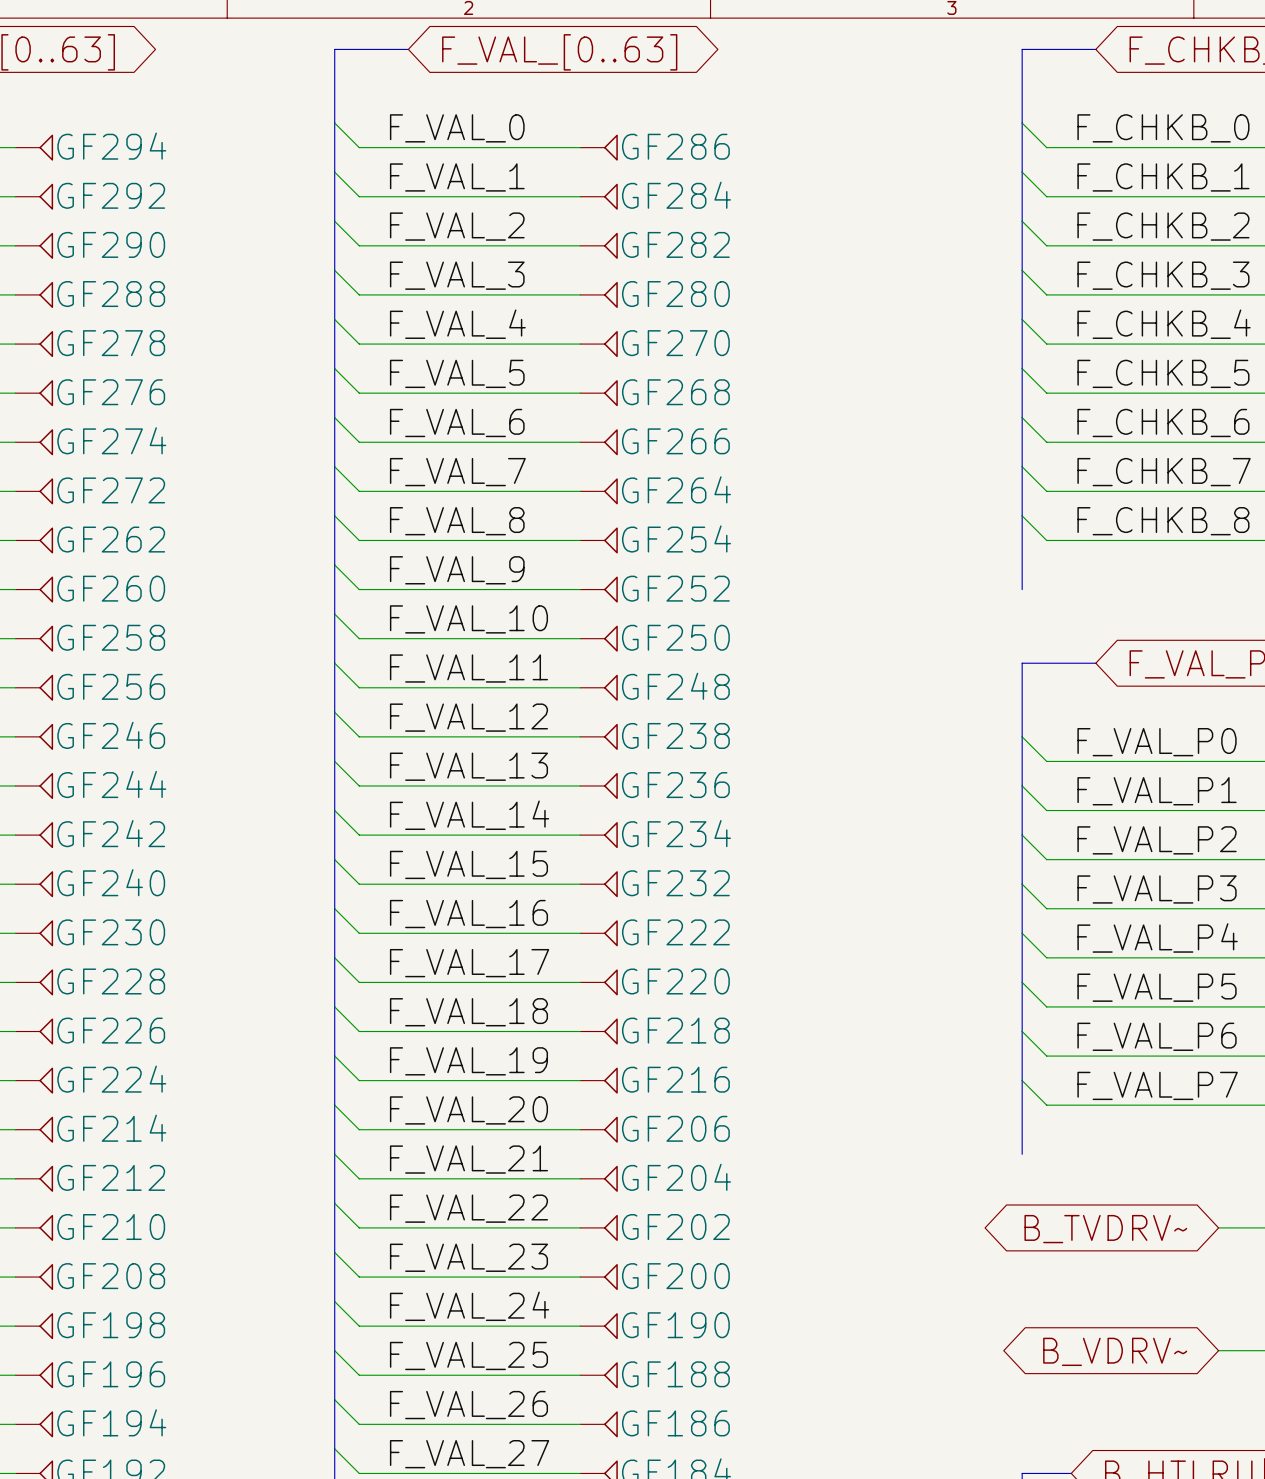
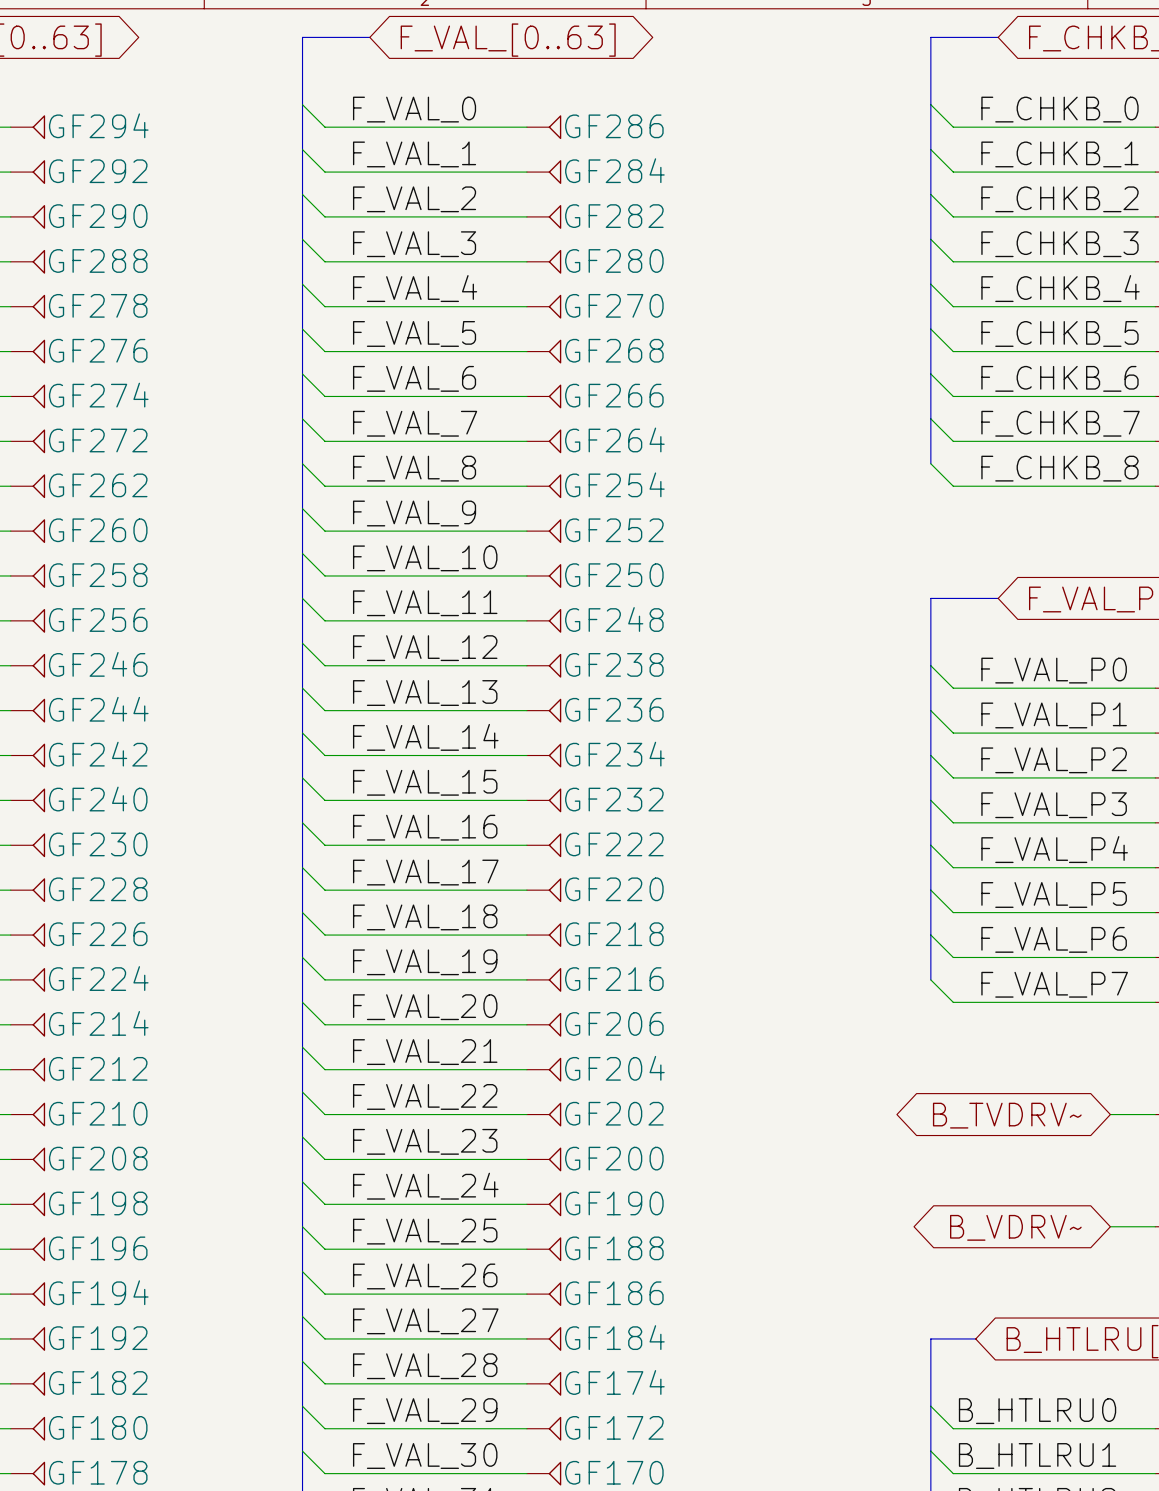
bus: (1022, 515) (1022, 589) -> none
bus: (1022, 1080) (1022, 1154) -> none

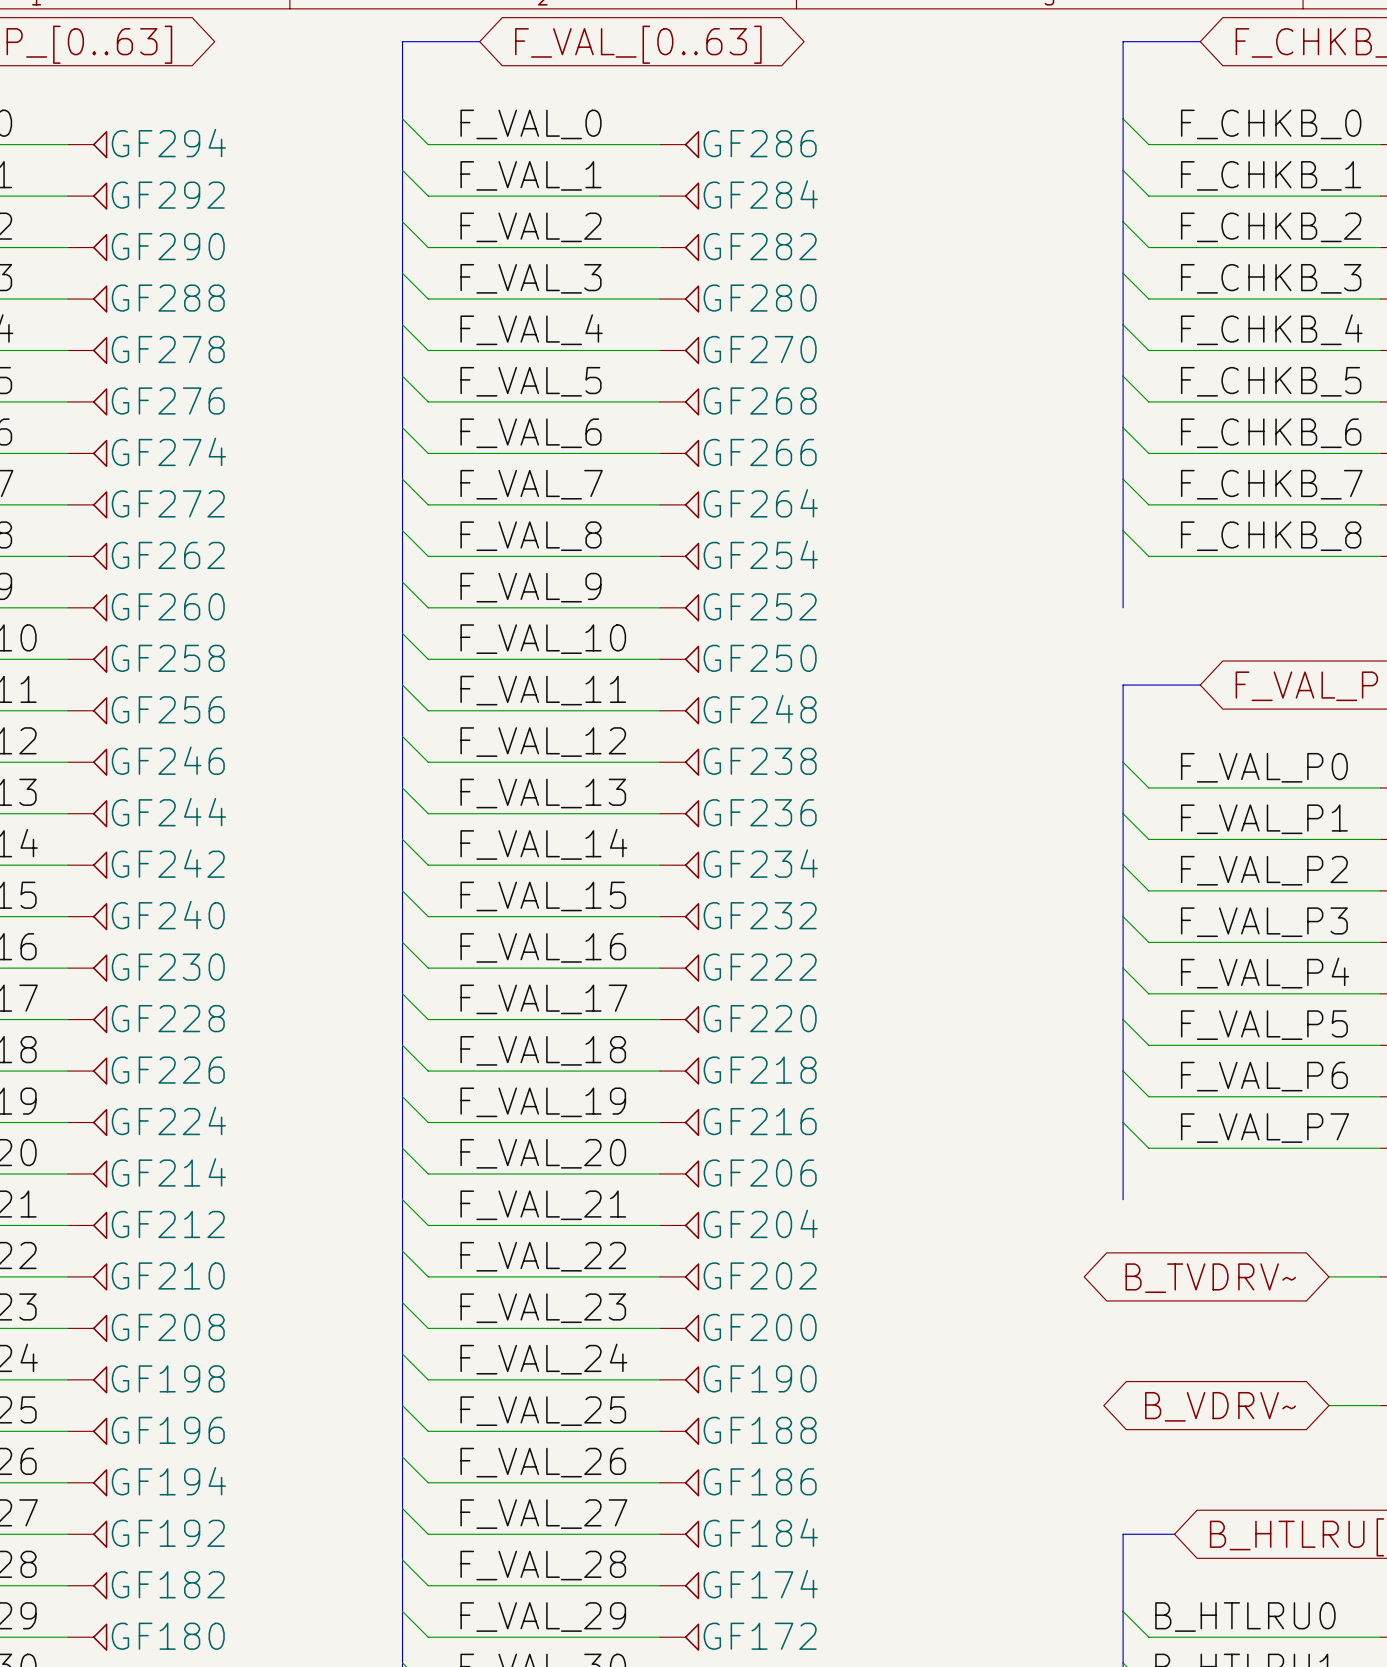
bus: none -> (1123, 530) (1123, 607)
bus: none -> (1123, 1122) (1123, 1199)

